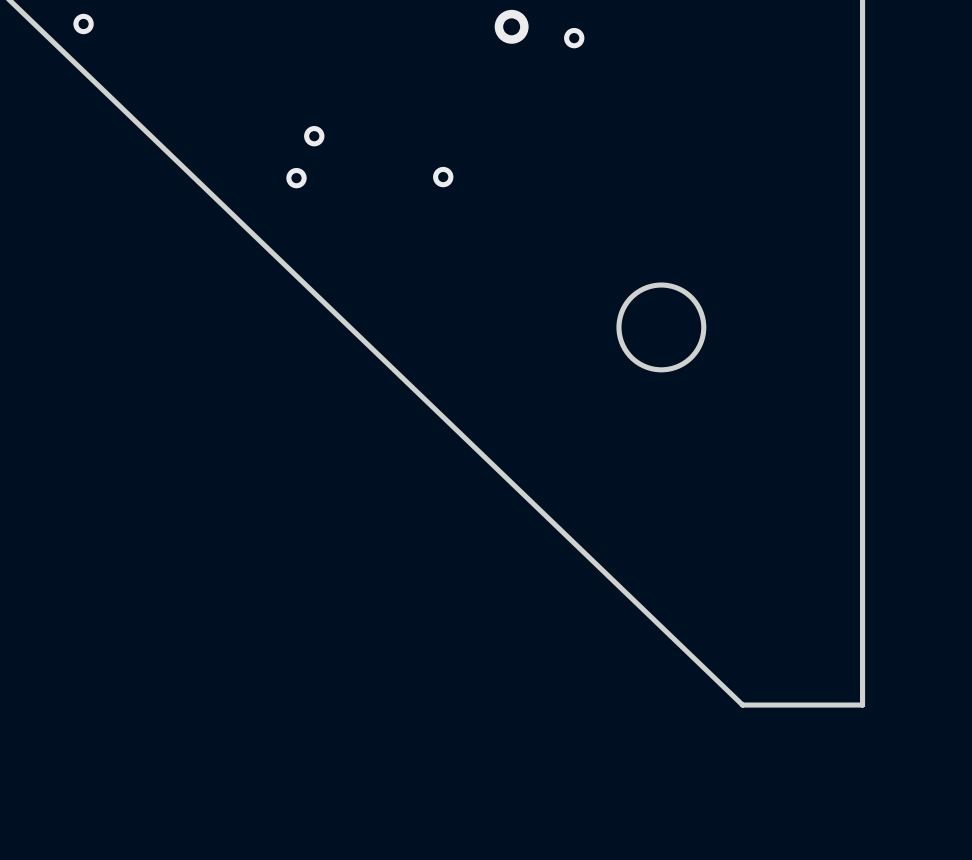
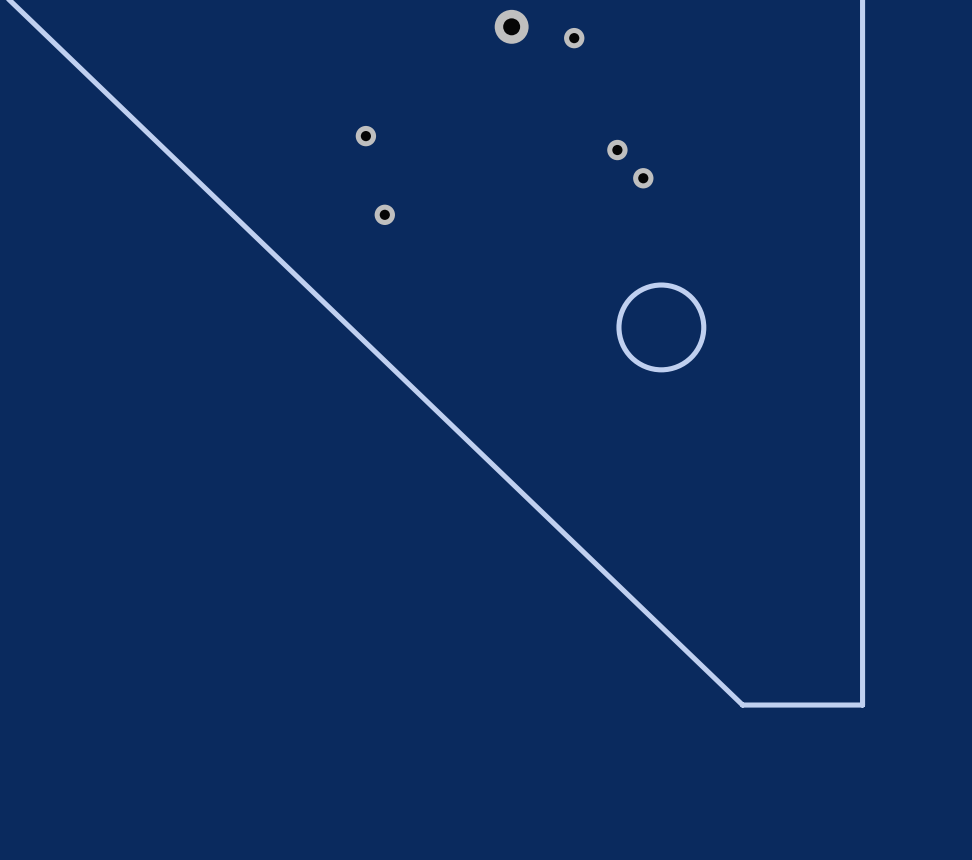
via: (83, 23) -> none
via: (314, 136) -> none
via: none -> (365, 136)
via: none -> (617, 150)
via: (443, 177) -> none
via: (296, 178) -> none
via: none -> (643, 178)
via: none -> (384, 214)

